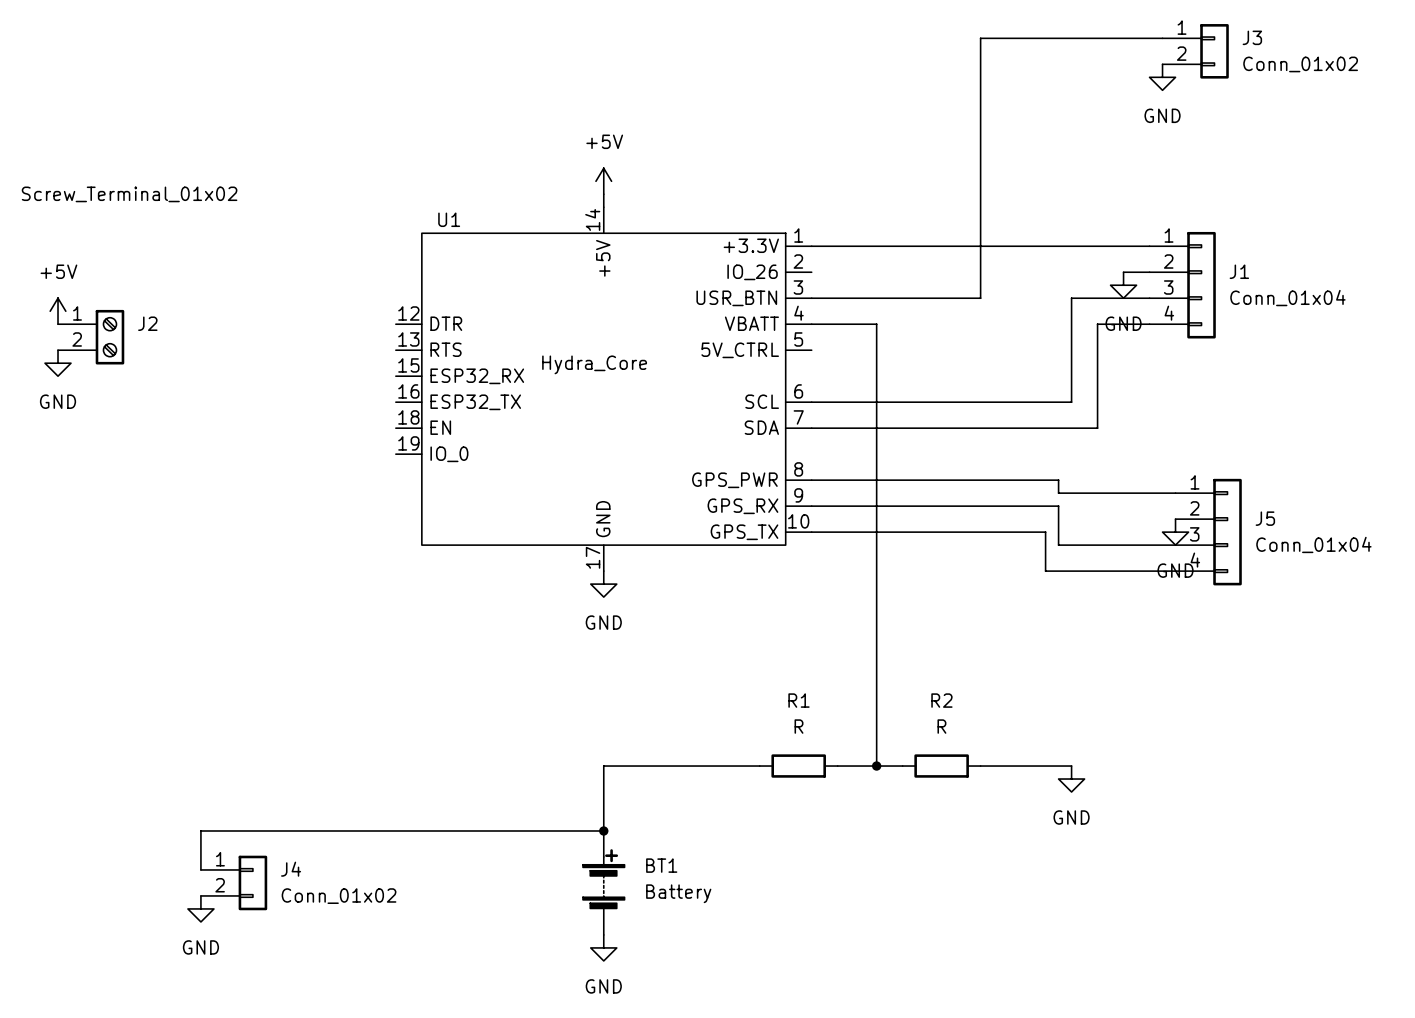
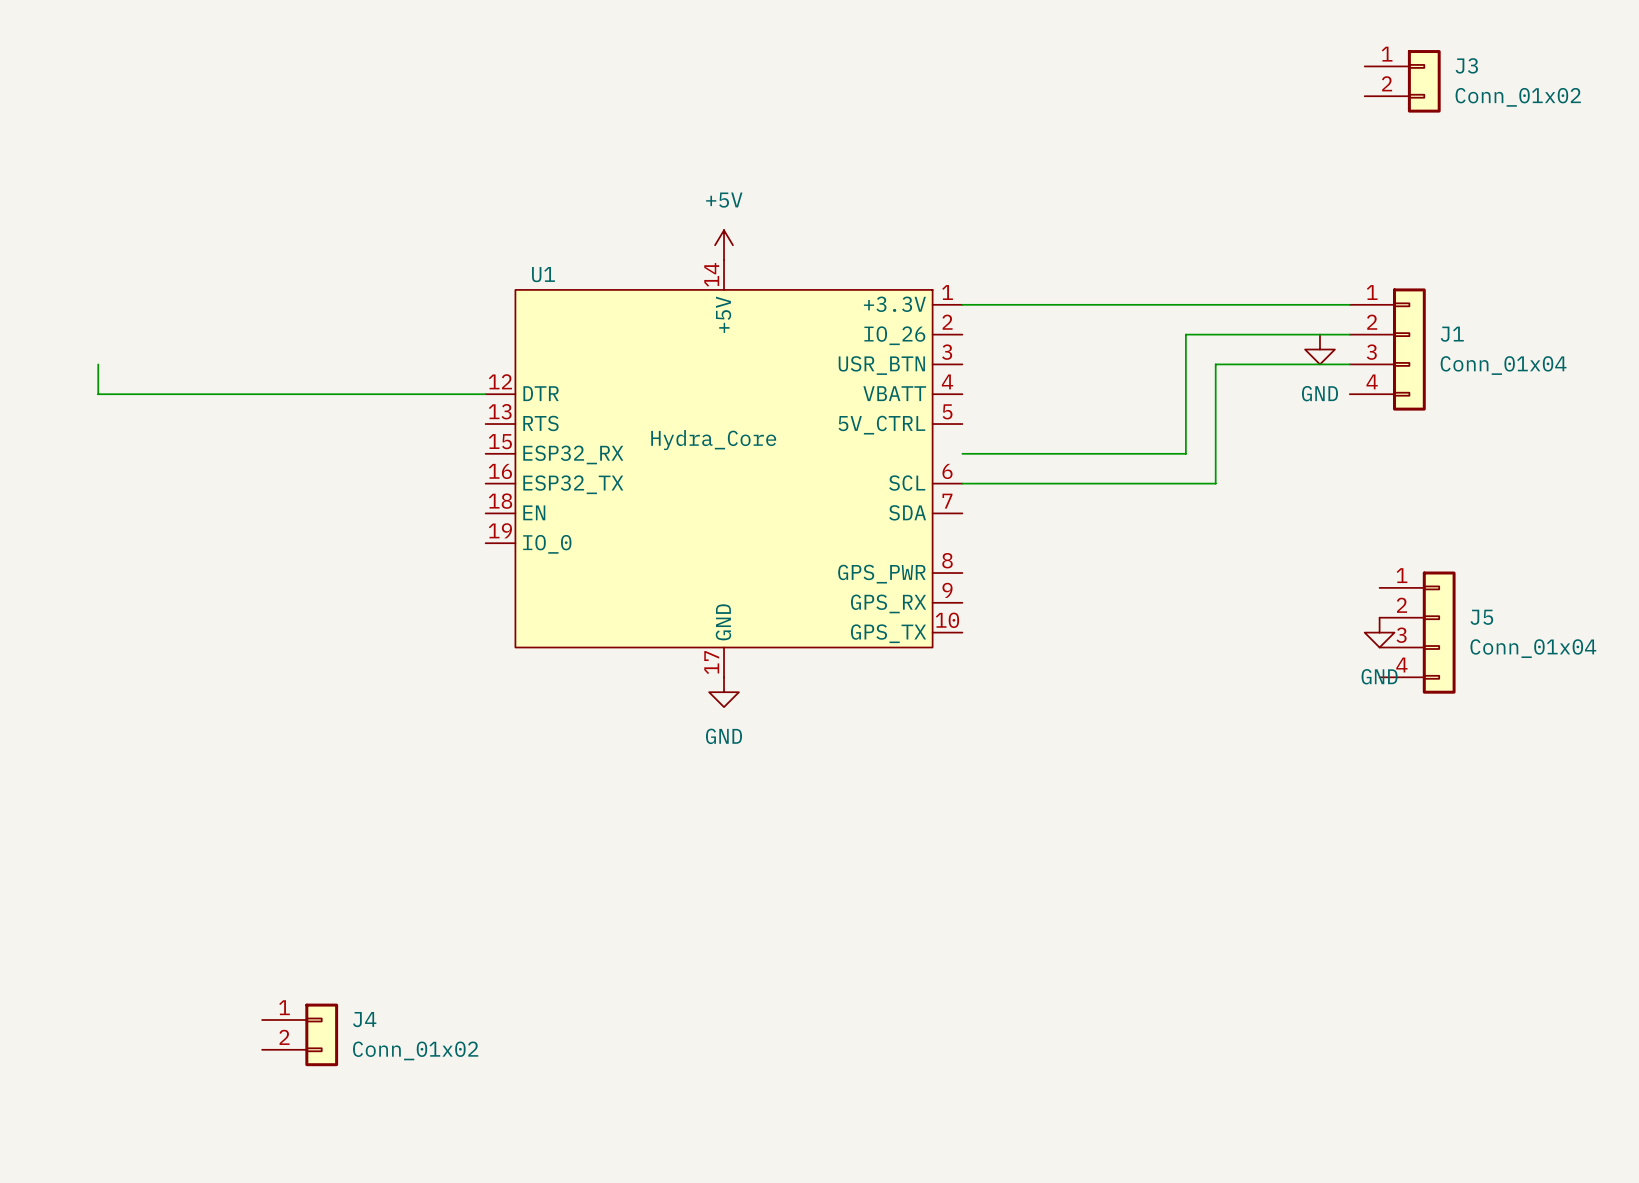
wire: (1162, 38) (980, 38) (980, 298) (811, 298) -> none
power symbol: GND (1162, 77) -> none
power symbol position: +5V (603, 181) -> +5V (724, 245)
wire: none -> (1319, 334) (1185, 334) (1185, 453) (962, 453)
wire: none -> (98, 364) (98, 394) (485, 394)
wire: (1071, 298) (1071, 402) (1032, 402) -> (1260, 364) (1215, 364) (1215, 483)
power symbol: +5V (58, 311) -> none
wire: (811, 324) (876, 324) (876, 766) -> none
wire: (1149, 324) (1097, 324) (1097, 428) (811, 428) -> none
J2: Screw_Terminal_01x02 (91, 337) -> none
power symbol: GND (58, 363) -> none
wire: (811, 480) (1058, 480) (1058, 493) (1175, 493) -> none
wire: (811, 506) (1058, 506) (1058, 545) (1175, 545) -> none
wire: (811, 532) (1045, 532) (1045, 571) (1175, 571) -> none
wire: (759, 766) (603, 766) (603, 830) (200, 830) (200, 869) -> none
R1: R (798, 766) -> none
wire: (837, 766) (902, 766) -> none
junction: (876, 766) -> none
R2: R (941, 766) -> none
wire: (980, 766) (1071, 766) -> none
power symbol: GND (1071, 779) -> none
junction: (603, 830) -> none
BT1: Battery (603, 882) -> none
power symbol: GND (200, 908) -> none
power symbol: GND (603, 947) -> none

